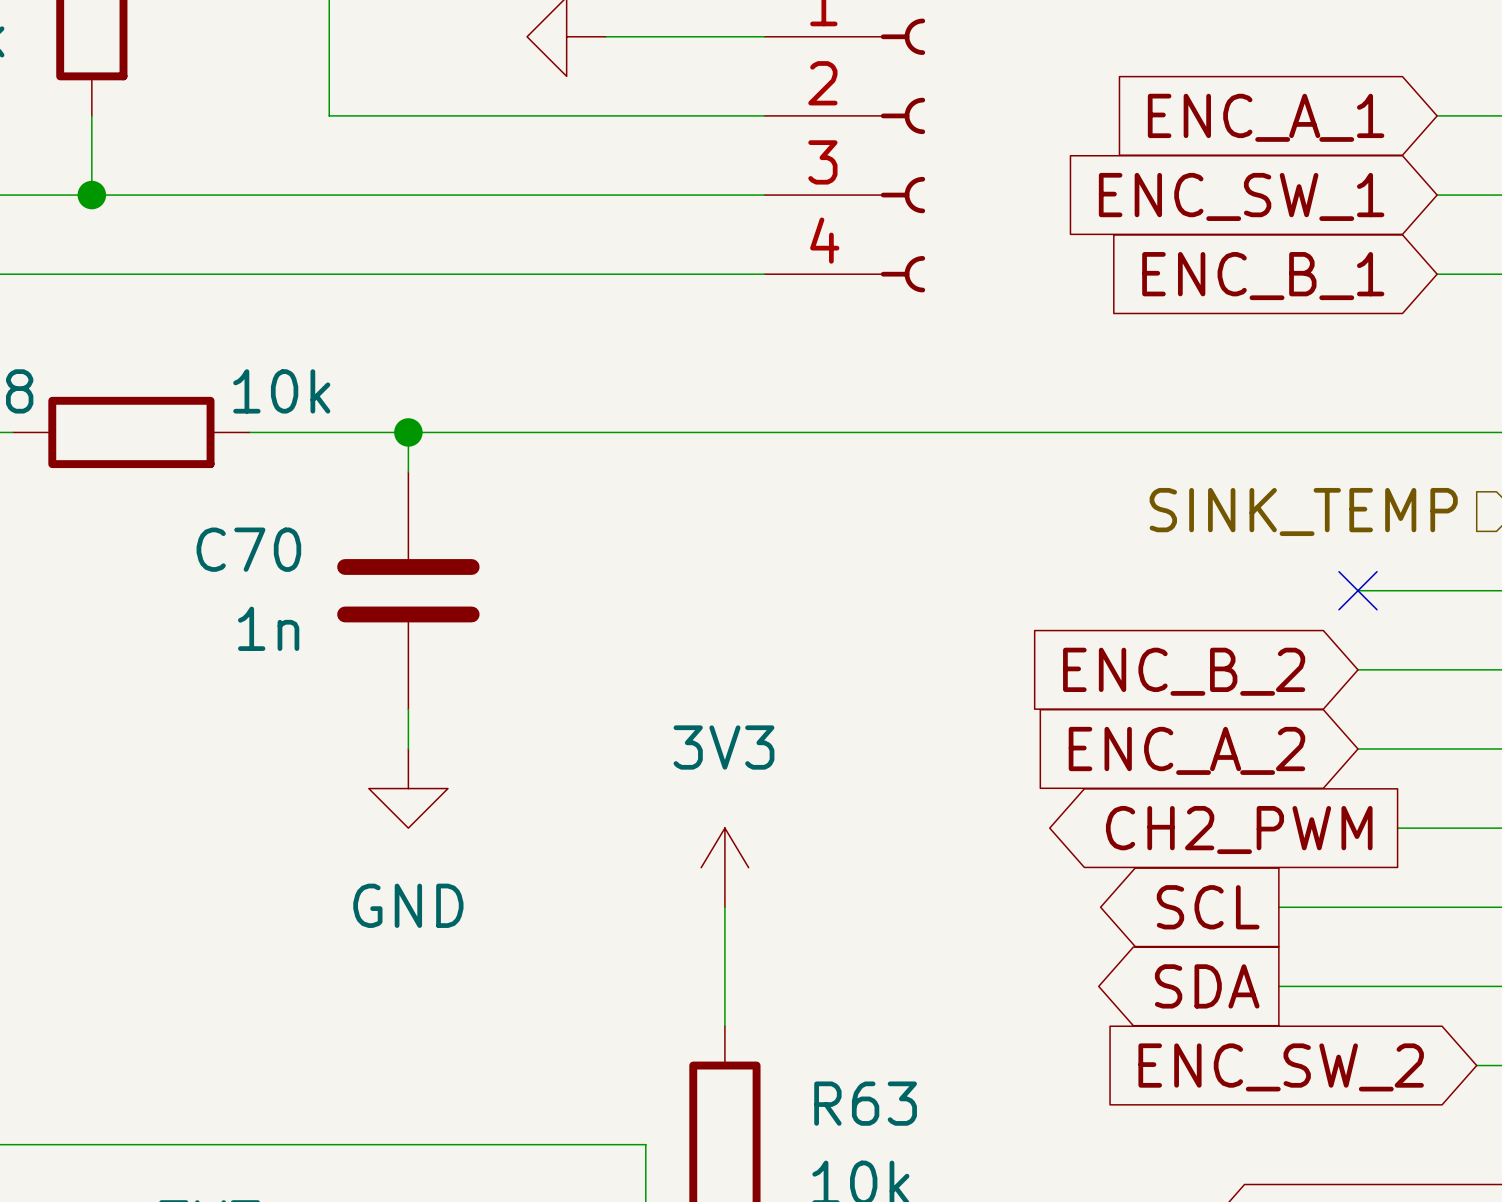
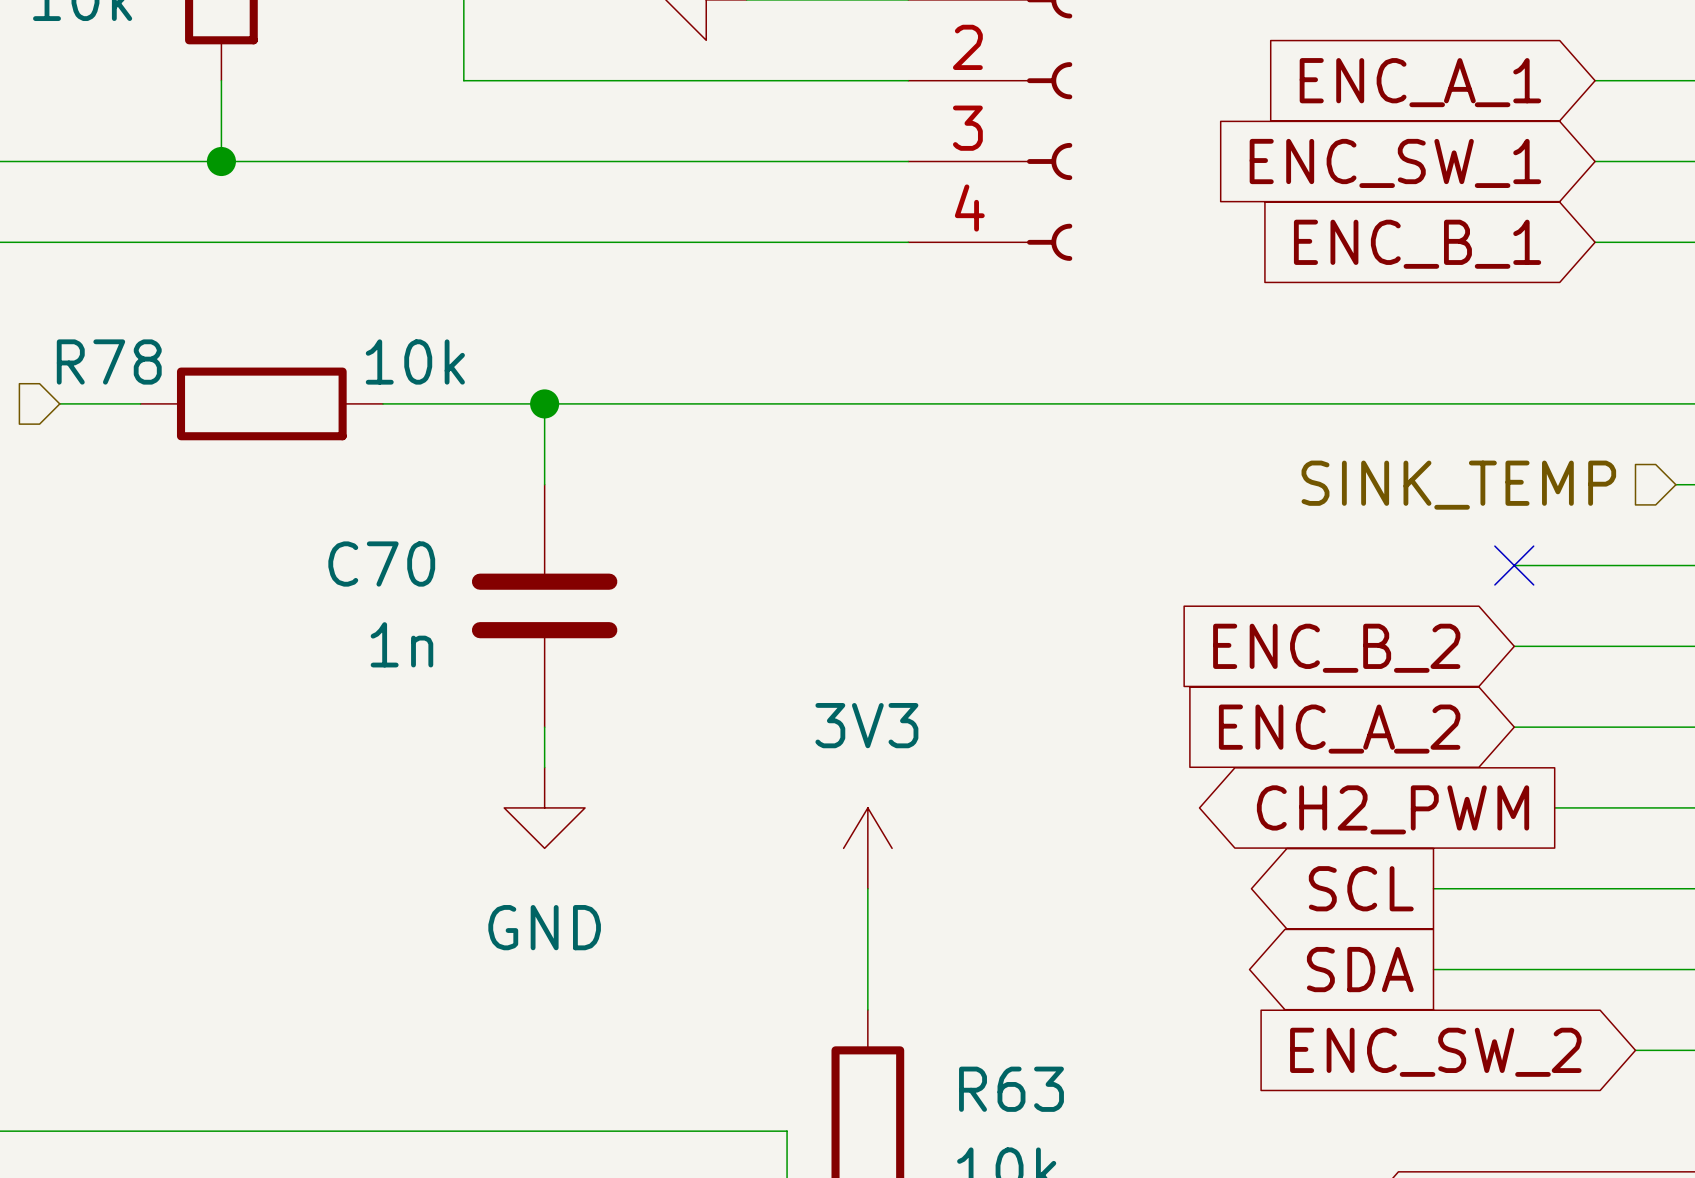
C70 position: (408, 590) -> (544, 605)
power symbol position: GND (408, 788) -> GND (544, 807)

